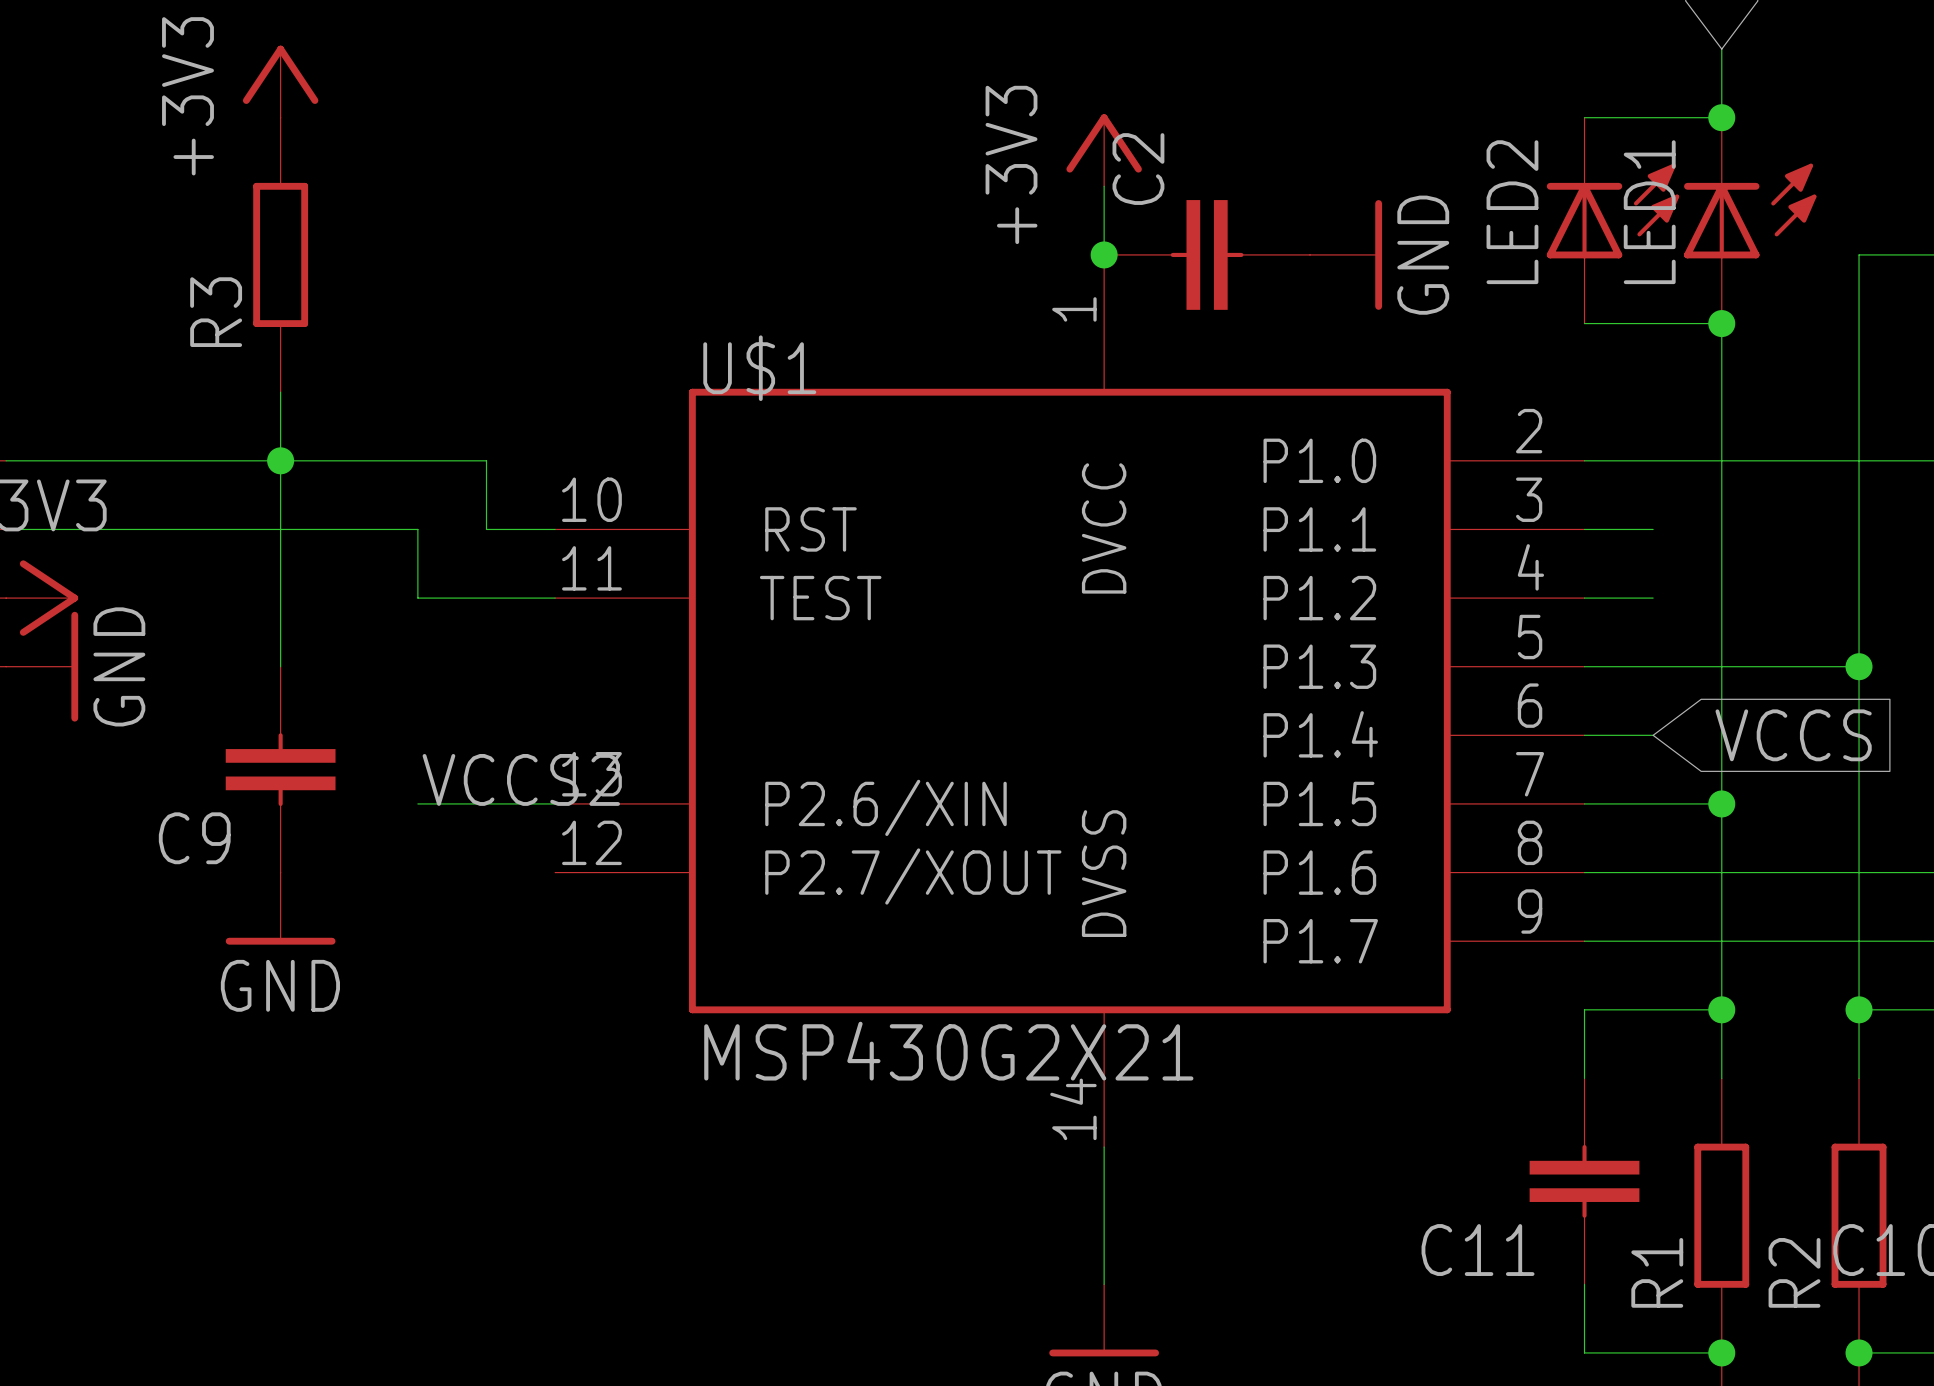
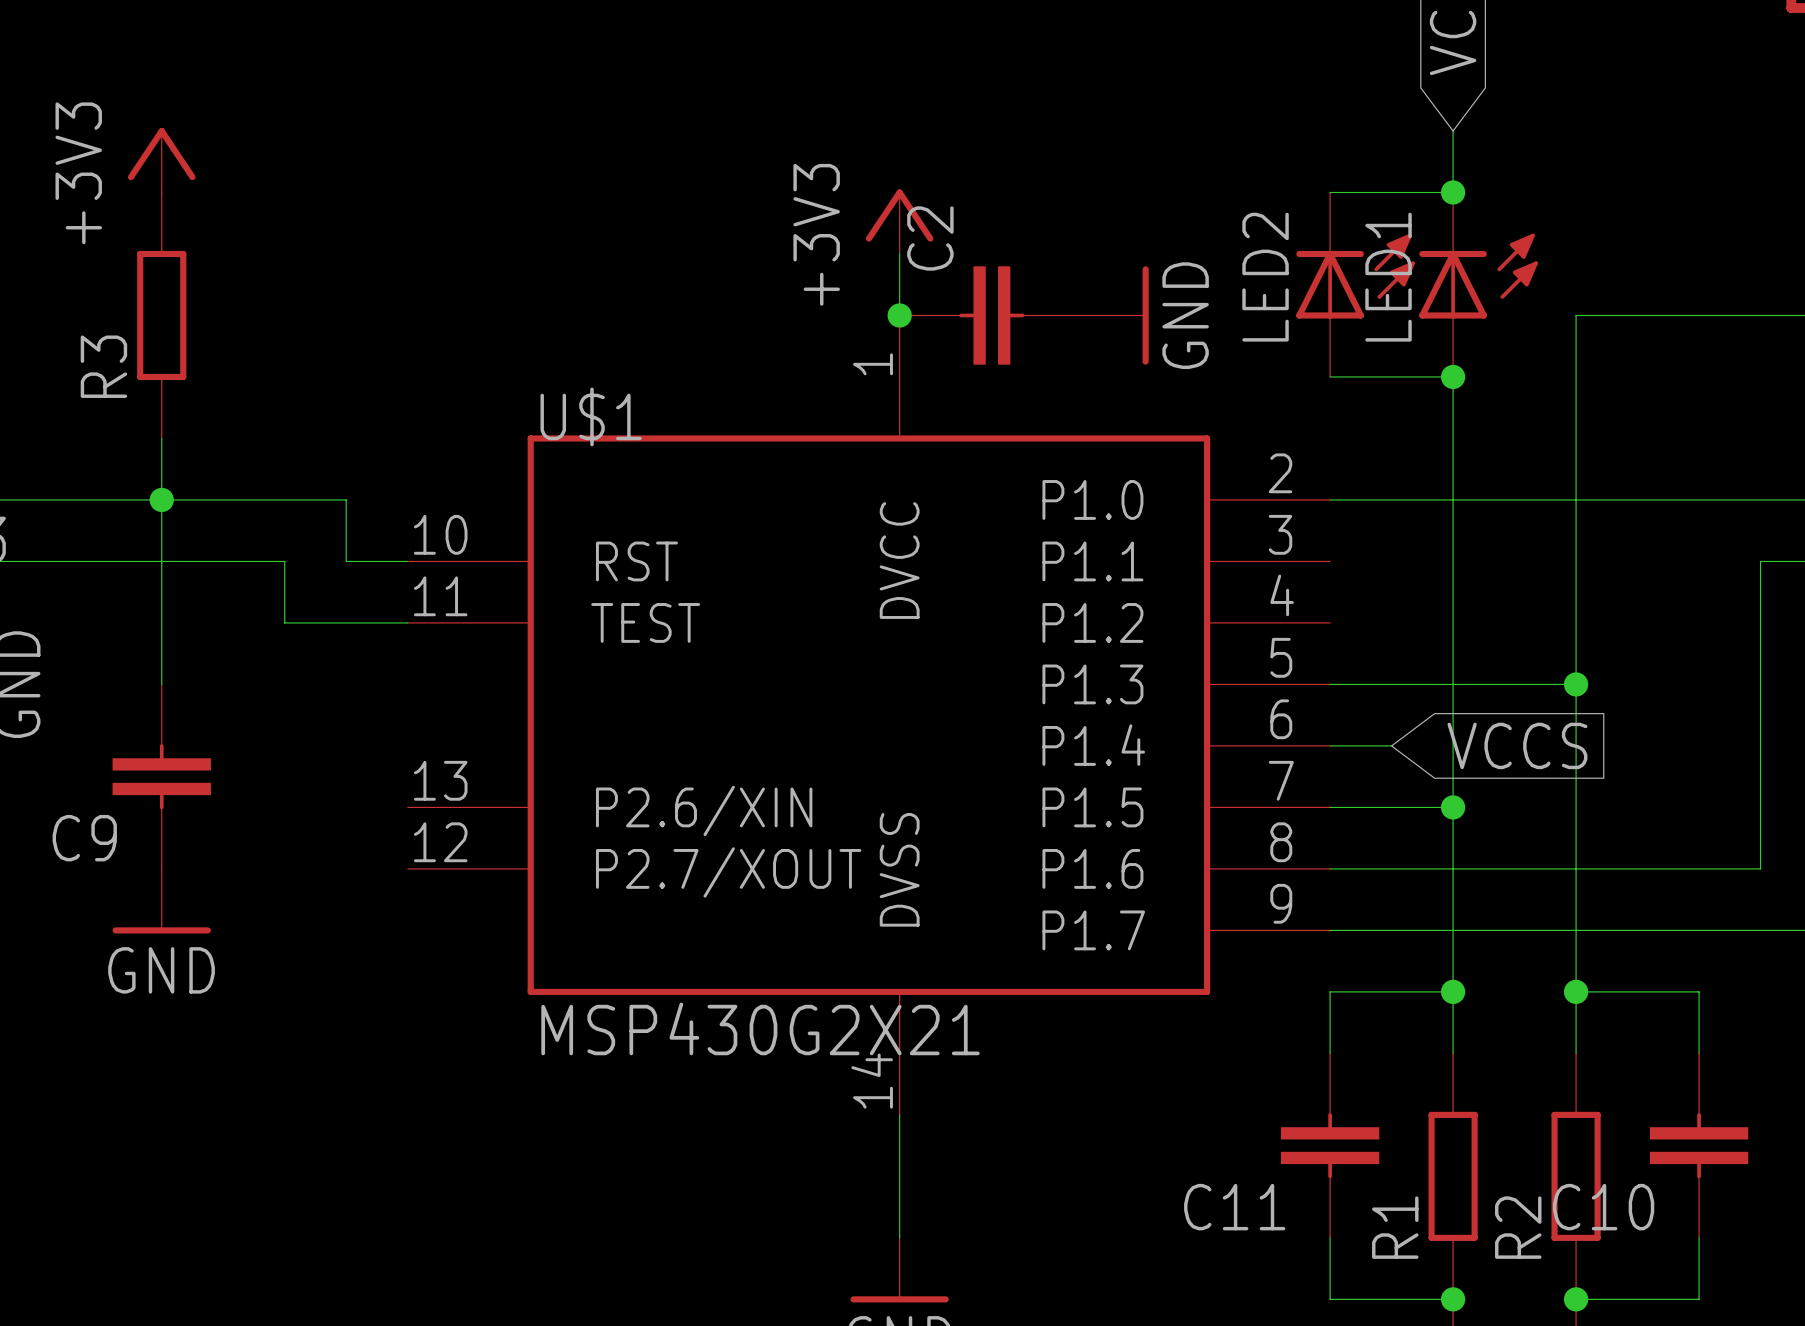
wire: (1584, 529) (1653, 529) -> none
wire: (1584, 598) (1653, 598) -> none
label: VCCS2 (521, 779) -> none
wire: (417, 803) (555, 803) -> none

